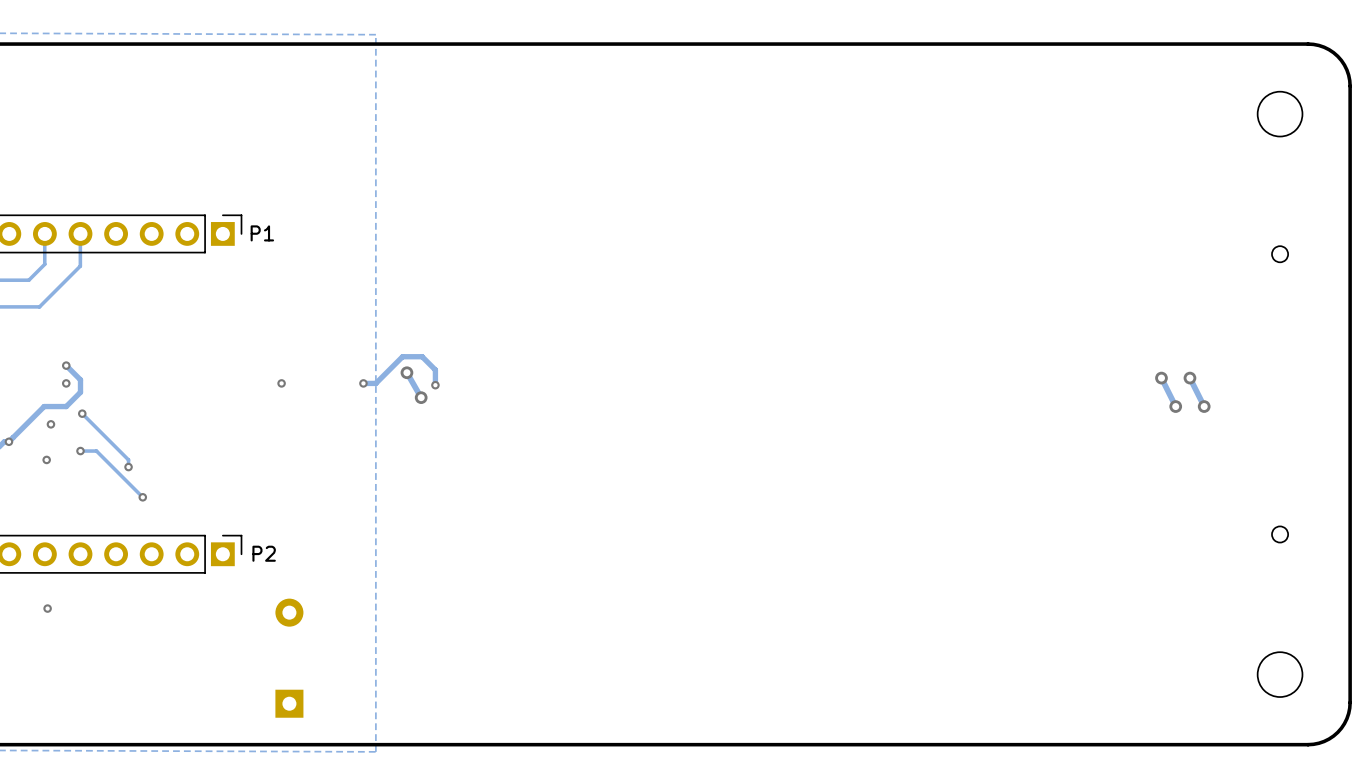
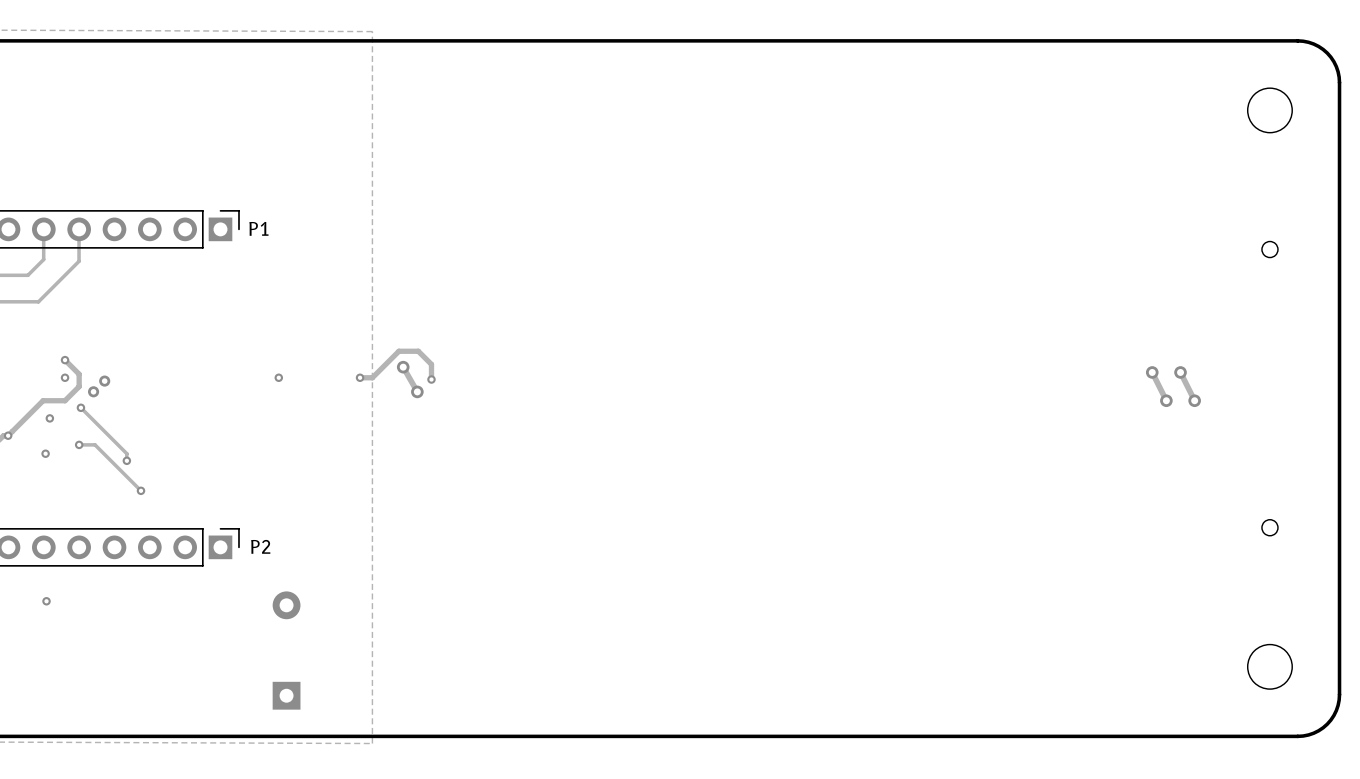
via: none -> (104, 381)
via: none -> (93, 391)

